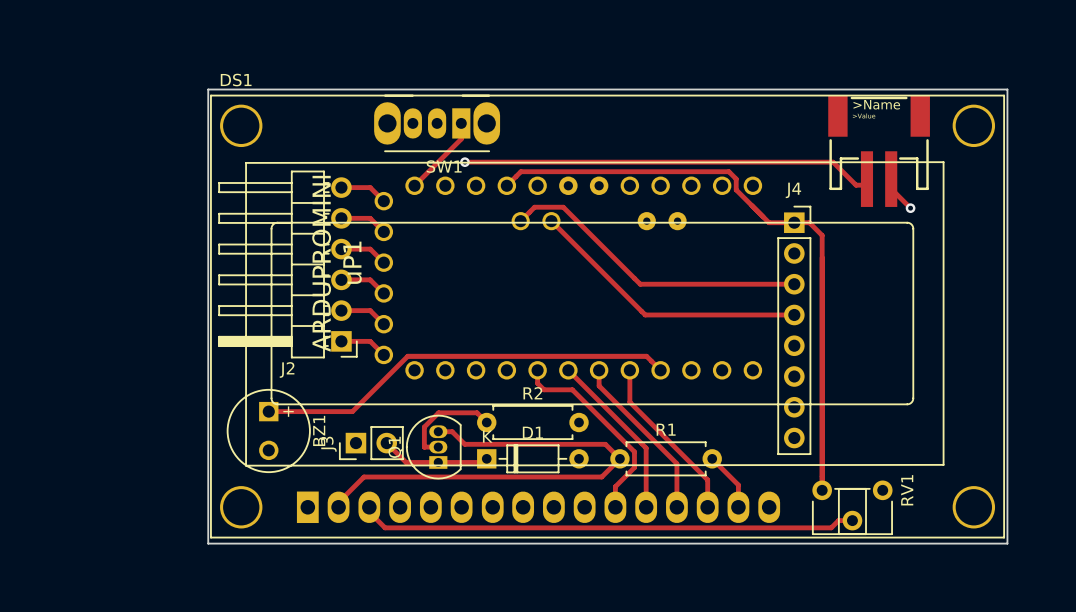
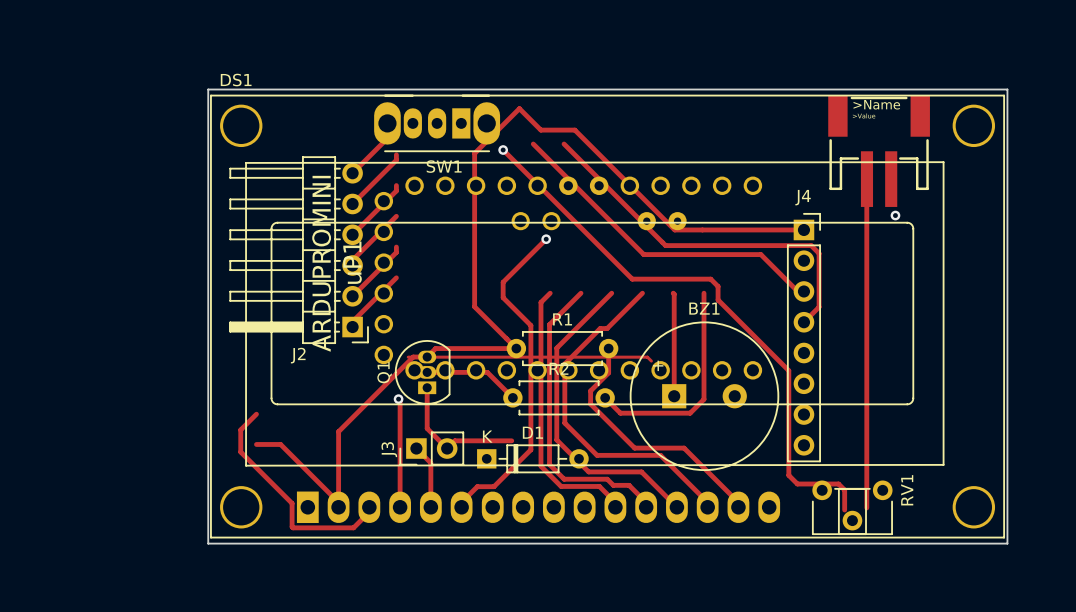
track: (461, 123) (461, 139) (414, 185) -> none
track: none -> (396, 124) (396, 129) (352, 173)
track: none -> (533, 144) (643, 254) (760, 254) (803, 297)
track: none -> (564, 144) (665, 245) (811, 245) (819, 253) (819, 307) (803, 322)
track: none -> (503, 150) (632, 279) (710, 279) (718, 286) (718, 299) (788, 370) (788, 475) (797, 484) (838, 484) (844, 490) (844, 510)
track: none -> (396, 154) (396, 160) (352, 204)
track: (464, 162) (833, 162) (856, 185) (866, 185) -> none
via position: (464, 162) -> (503, 150)
track: none -> (866, 173) (866, 507)
track: none -> (396, 185) (396, 190) (352, 234)
track: (506, 185) (520, 171) (728, 171) (736, 179) (736, 189) (769, 222) (809, 222) (822, 235) (822, 490) -> none
track: (891, 185) (891, 188) (910, 208) -> none
track: (341, 187) (370, 187) (383, 201) -> none
via position: (910, 208) -> (895, 215)
track: none -> (396, 216) (352, 260) (352, 265)
track: (341, 218) (370, 218) (383, 231) -> none
track: (520, 221) (534, 207) (563, 207) (640, 284) (794, 284) -> none
track: (551, 221) (645, 314) (794, 314) -> none
track: none -> (803, 229) (674, 229) (574, 130) (540, 130) (519, 108) (474, 153) (474, 306) (516, 348) (435, 348) (427, 357) (413, 357) (338, 431) (338, 502) (280, 444) (256, 444)
track: none -> (546, 239) (503, 282) (503, 297) (530, 325) (530, 449) (494, 486) (477, 486) (461, 502) (461, 507)
via: none -> (546, 239)
track: none -> (396, 247) (396, 252) (352, 296)
track: (341, 249) (370, 249) (383, 262) -> none
J2 position: (287, 264) -> (299, 250)
track: none -> (396, 277) (352, 321) (352, 327)
track: (341, 279) (370, 279) (383, 293) -> none
track: none -> (673, 293) (674, 396)
track: none -> (704, 293) (704, 399) (690, 413) (620, 413) (605, 397)
track: (341, 310) (370, 310) (383, 324) -> none
J4 position: (794, 330) -> (803, 337)
track: (341, 341) (370, 341) (383, 354) -> none
track: (537, 370) (537, 383) (544, 389) (572, 389) (634, 451) (634, 467) (615, 486) (615, 502) -> (550, 293) (540, 302) (540, 466) (561, 486) (599, 486) (615, 502)
track: (568, 370) (646, 448) (646, 502) -> (580, 293) (549, 324) (549, 464) (564, 479) (607, 479) (613, 485) (629, 485) (646, 502)
track: (599, 370) (599, 385) (676, 463) (676, 507) -> (611, 293) (556, 348) (556, 440) (588, 471) (641, 471) (676, 507)
track: (629, 370) (629, 402) (707, 479) (707, 502) -> (642, 293) (607, 328) (600, 328) (564, 363) (564, 423) (597, 455) (660, 455) (707, 502)
track: (660, 370) (646, 356) (407, 356) (352, 411) (268, 411) -> none
track: none -> (427, 372) (487, 372) (512, 397)
track: none -> (427, 387) (427, 428) (447, 448) (454, 440) (511, 440)
BZ1 footprint: [226, 389, 311, 473] -> [629, 321, 780, 472]
track: none -> (398, 399) (400, 400) (400, 507)
via: none -> (398, 399)
track: (486, 422) (477, 412) (438, 412) (424, 427) (424, 447) (438, 447) -> none
R2 position: (532, 422) -> (559, 397)
BZ1 name position: BZ1 (319, 430) -> BZ1 (704, 308)
track: (438, 431) (452, 431) (464, 444) (605, 444) (619, 458) (601, 477) (364, 477) (338, 502) -> none
J3 position: (371, 443) -> (431, 448)
track: (386, 443) (406, 462) (483, 462) (486, 458) -> none
Q1 position: (433, 447) -> (422, 372)
track: none -> (416, 448) (430, 462) (430, 507)
R1 position: (666, 458) -> (562, 348)
track: (712, 458) (738, 485) (738, 502) -> (608, 348) (608, 372) (590, 390) (590, 404) (634, 448) (684, 448) (738, 502)
track: (369, 512) (385, 527) (831, 527) (838, 520) (852, 520) -> (369, 512) (353, 527) (293, 527) (292, 503) (240, 452) (240, 429) (256, 414)

